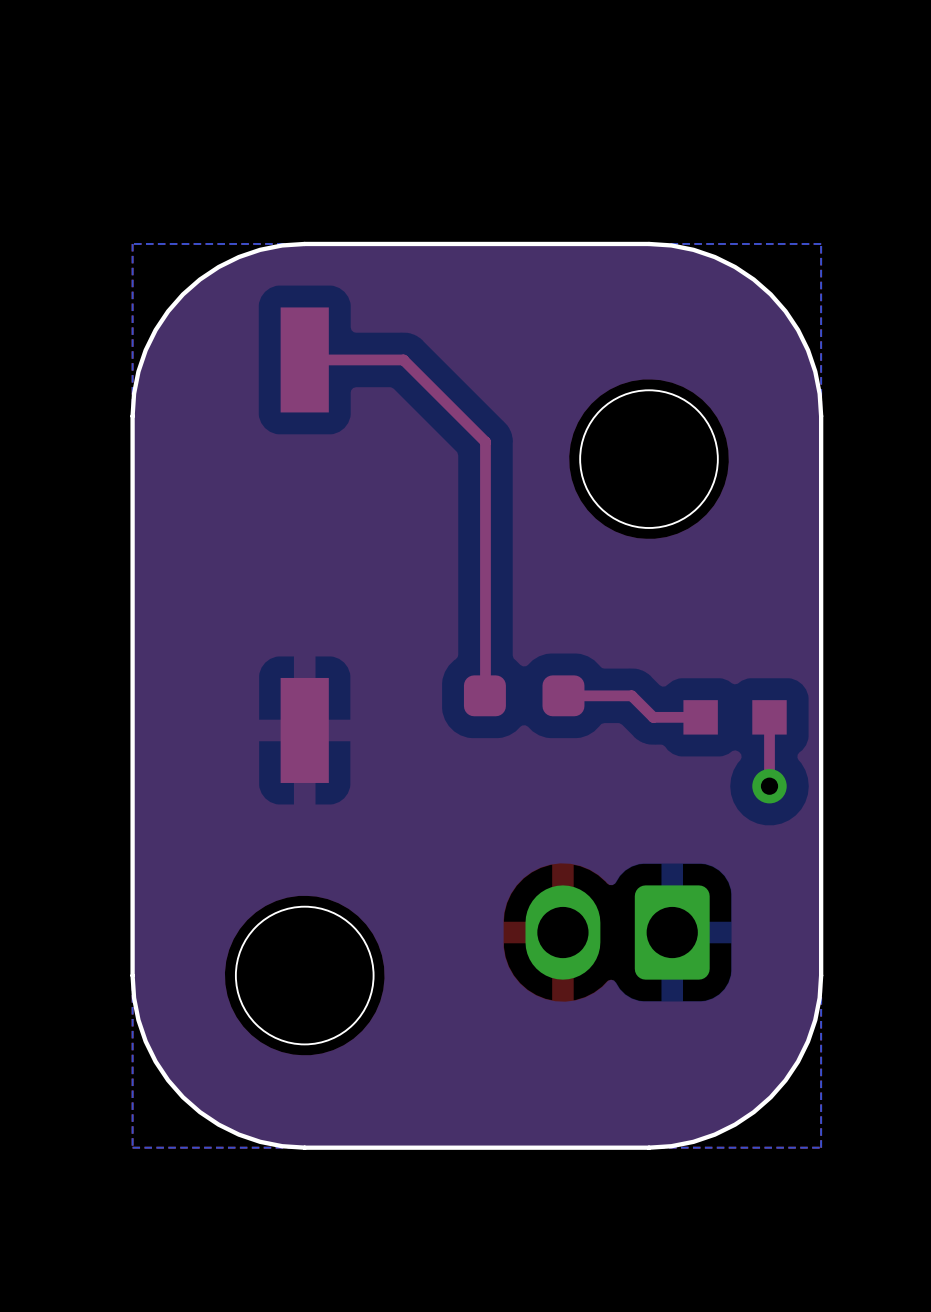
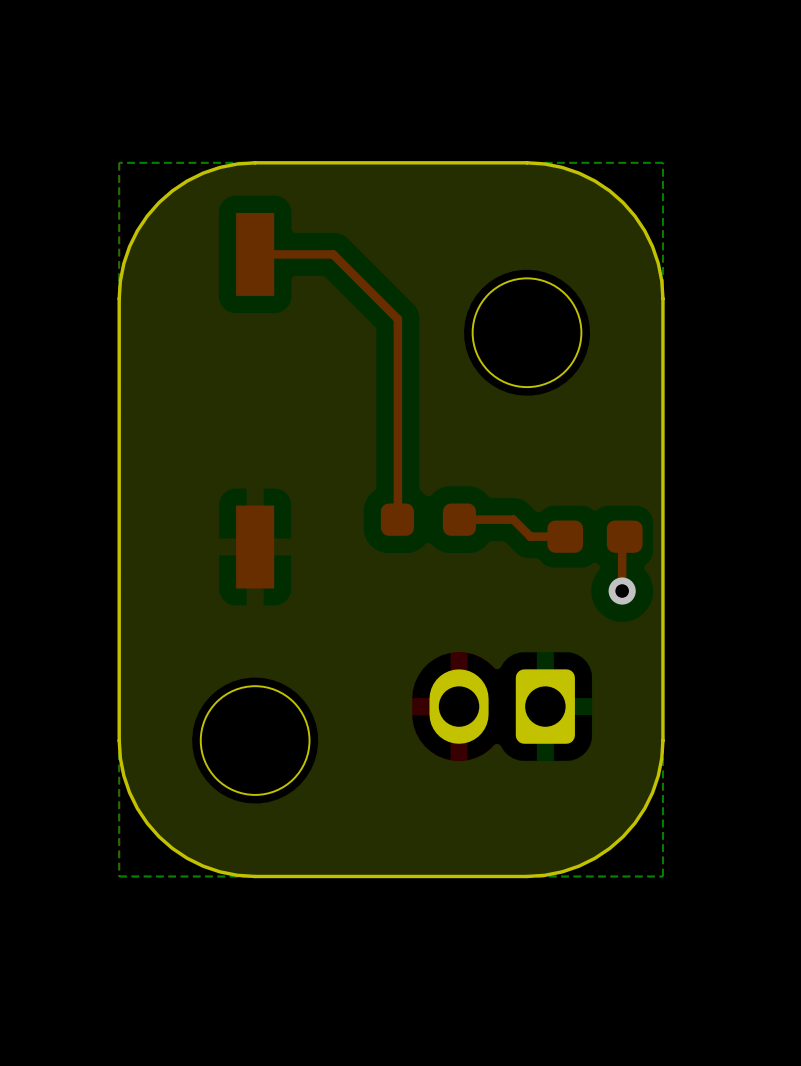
part footprint: [683, 700, 787, 735] -> [547, 520, 643, 553]

